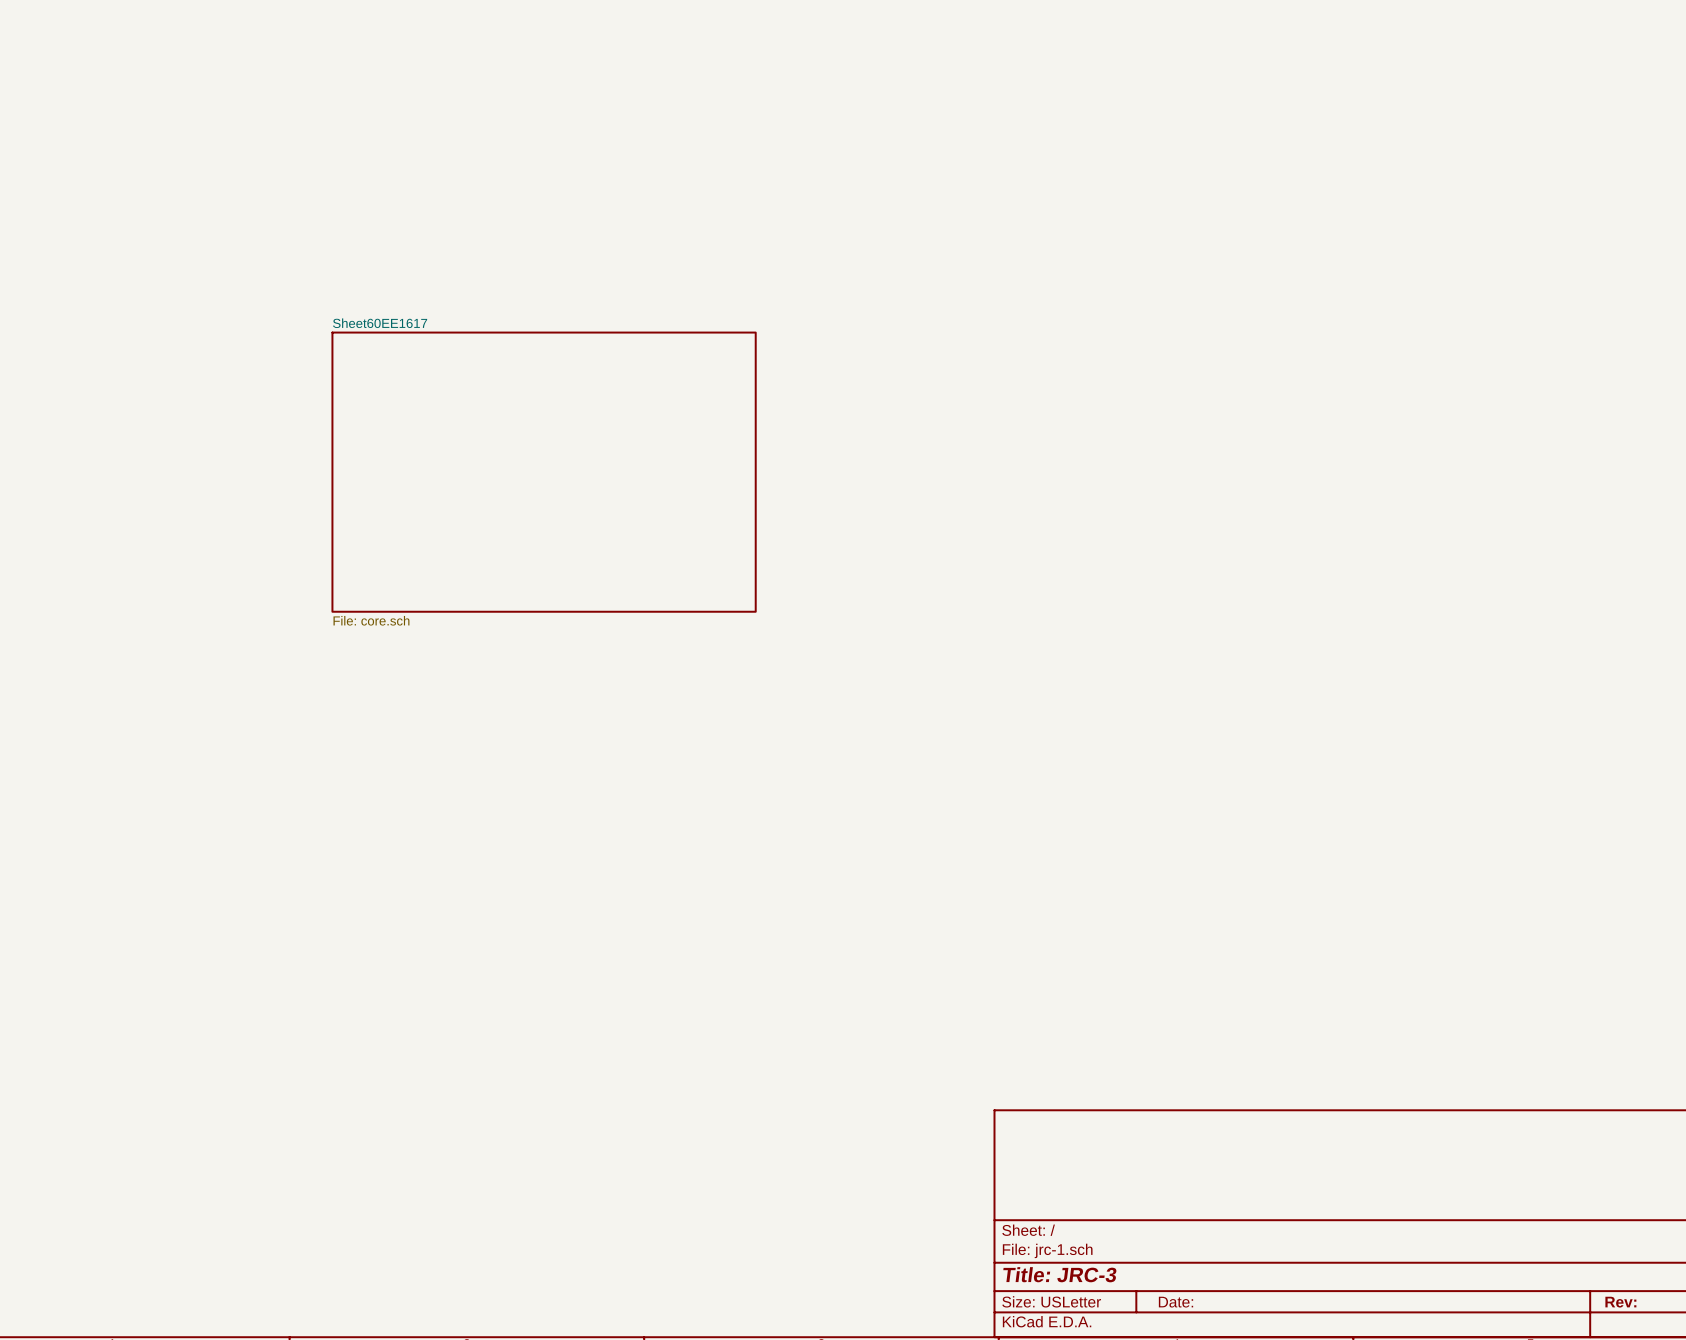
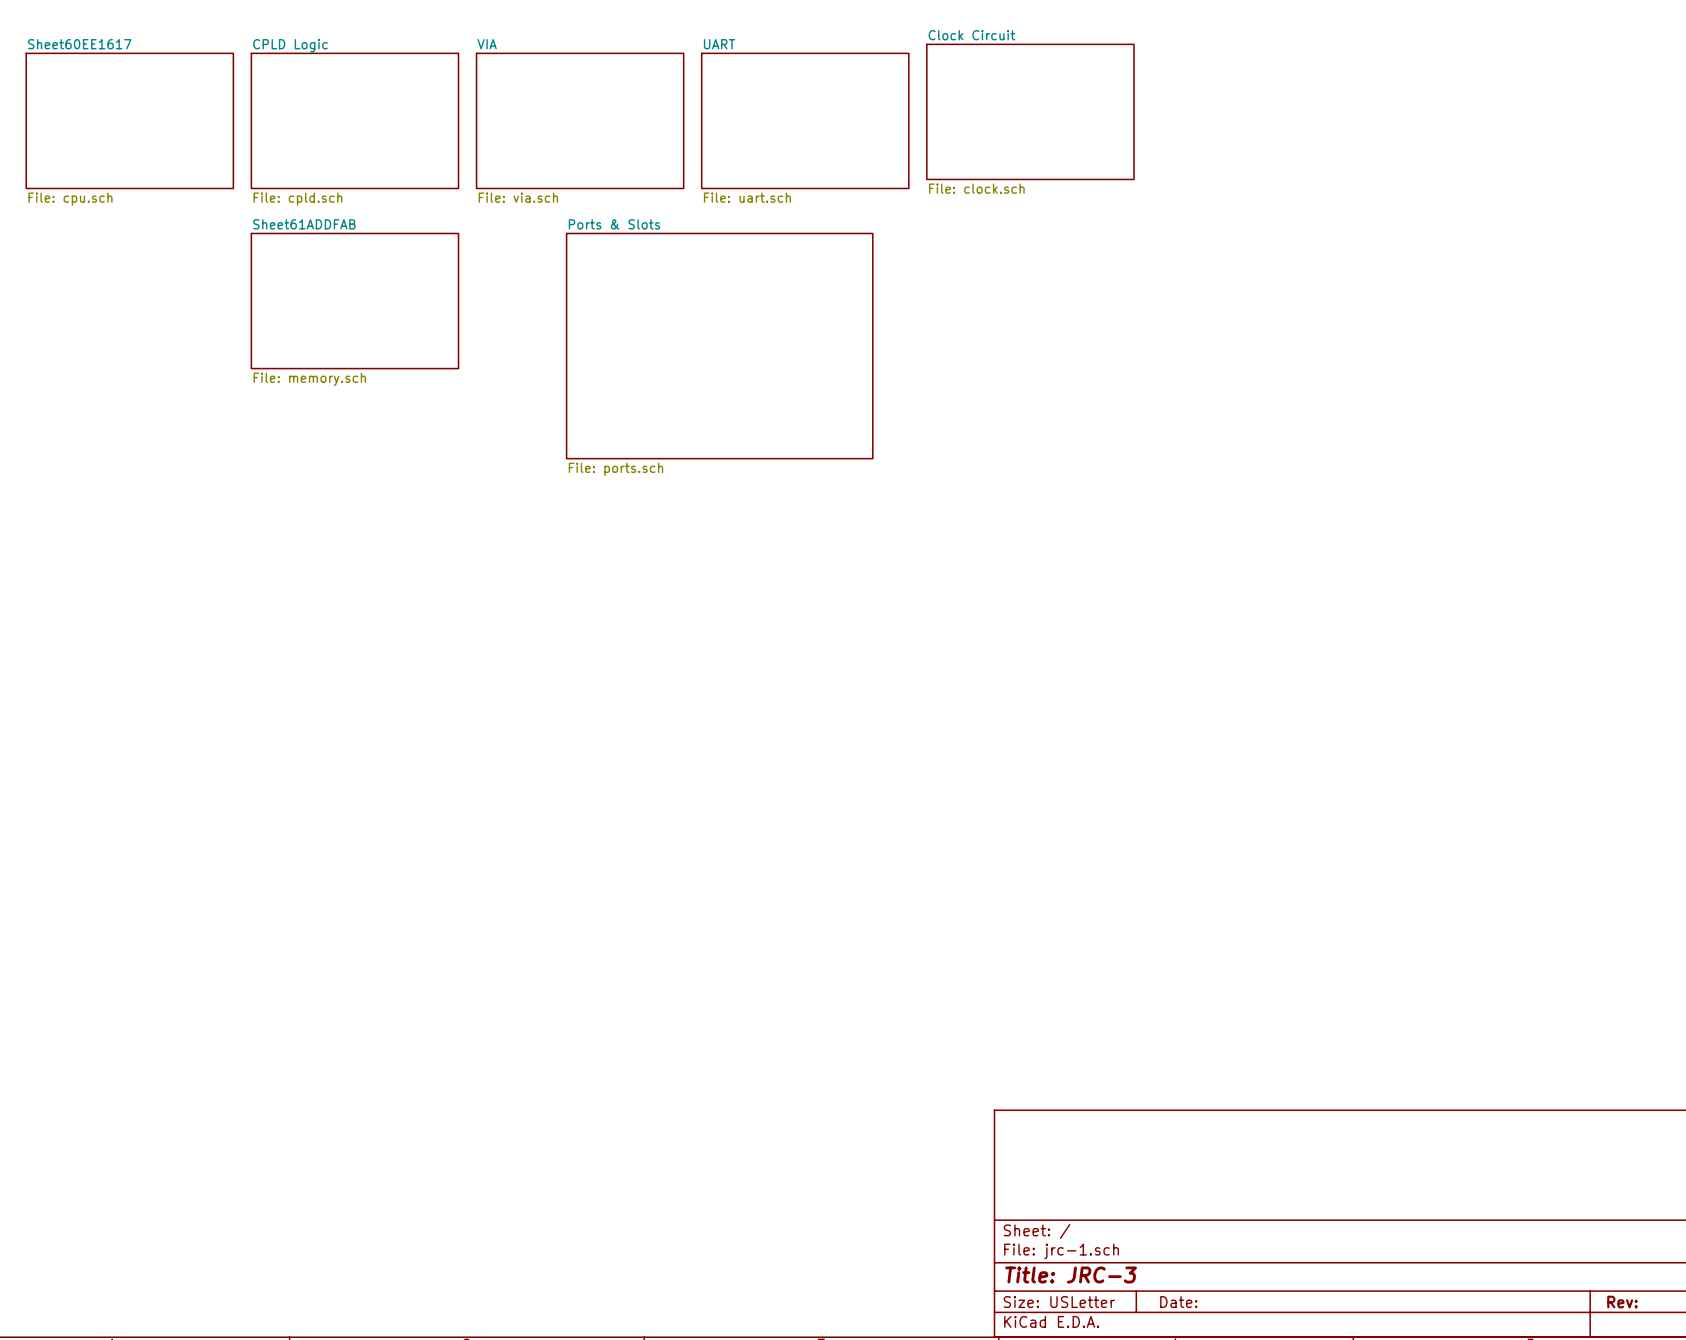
sheet Clock Circuit: none -> File: clock.sch (1030, 111)
sheet CPLD Logic: none -> File: cpld.sch (354, 120)
sheet VIA: none -> File: via.sch (580, 120)
sheet UART: none -> File: uart.sch (805, 120)
sheet Sheet61ADDFAB: none -> File: memory.sch (354, 301)
sheet Sheet60EE1617 name position: Sheet60EE1617 (380, 323) -> Sheet60EE1617 (79, 44)
sheet Sheet60EE1617 shape: [332, 332, 756, 612] -> [26, 53, 234, 189]
sheet Ports & Slots: none -> File: ports.sch (719, 346)
sheet Sheet60EE1617 value: File: core.sch (371, 620) -> File: cpu.sch (70, 199)

